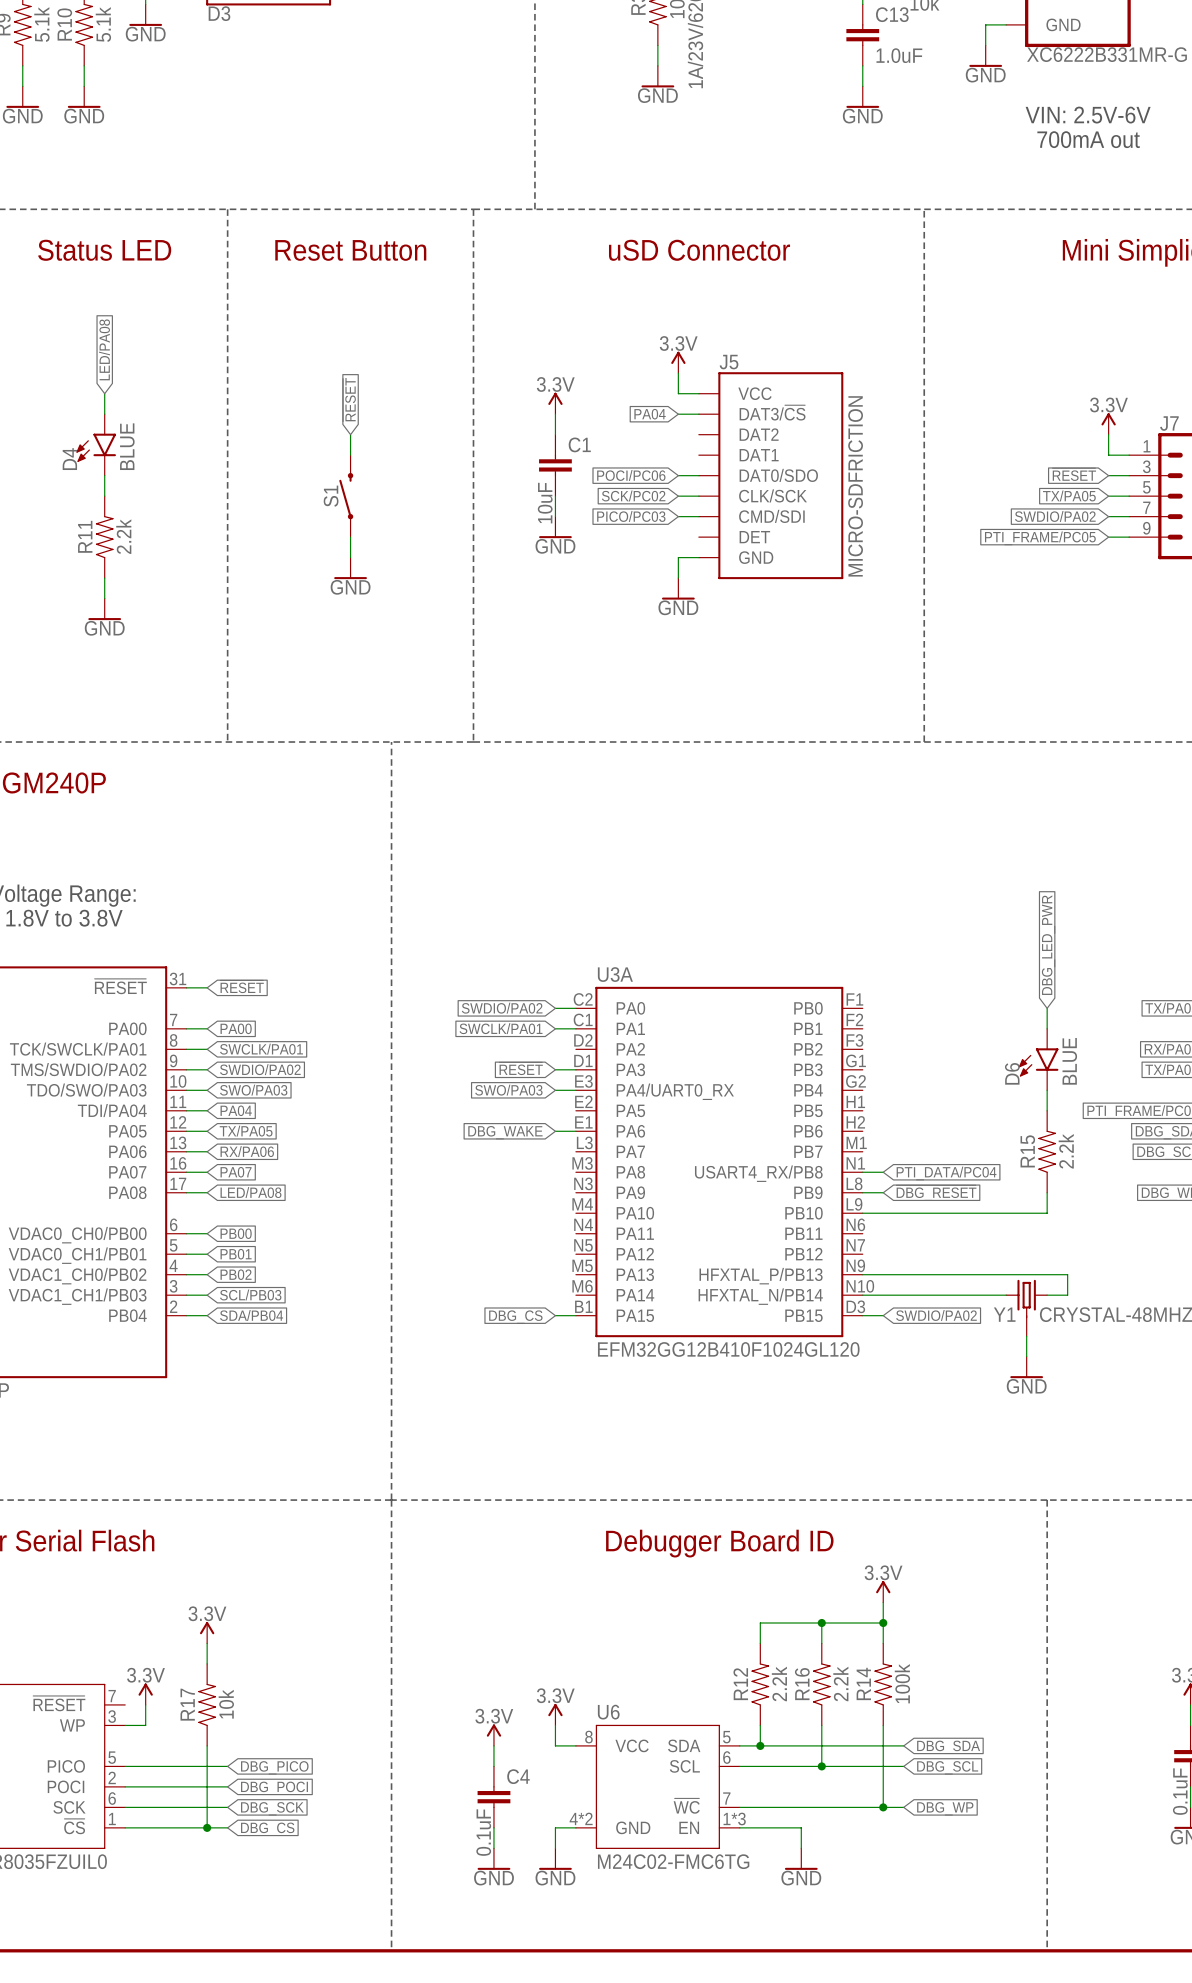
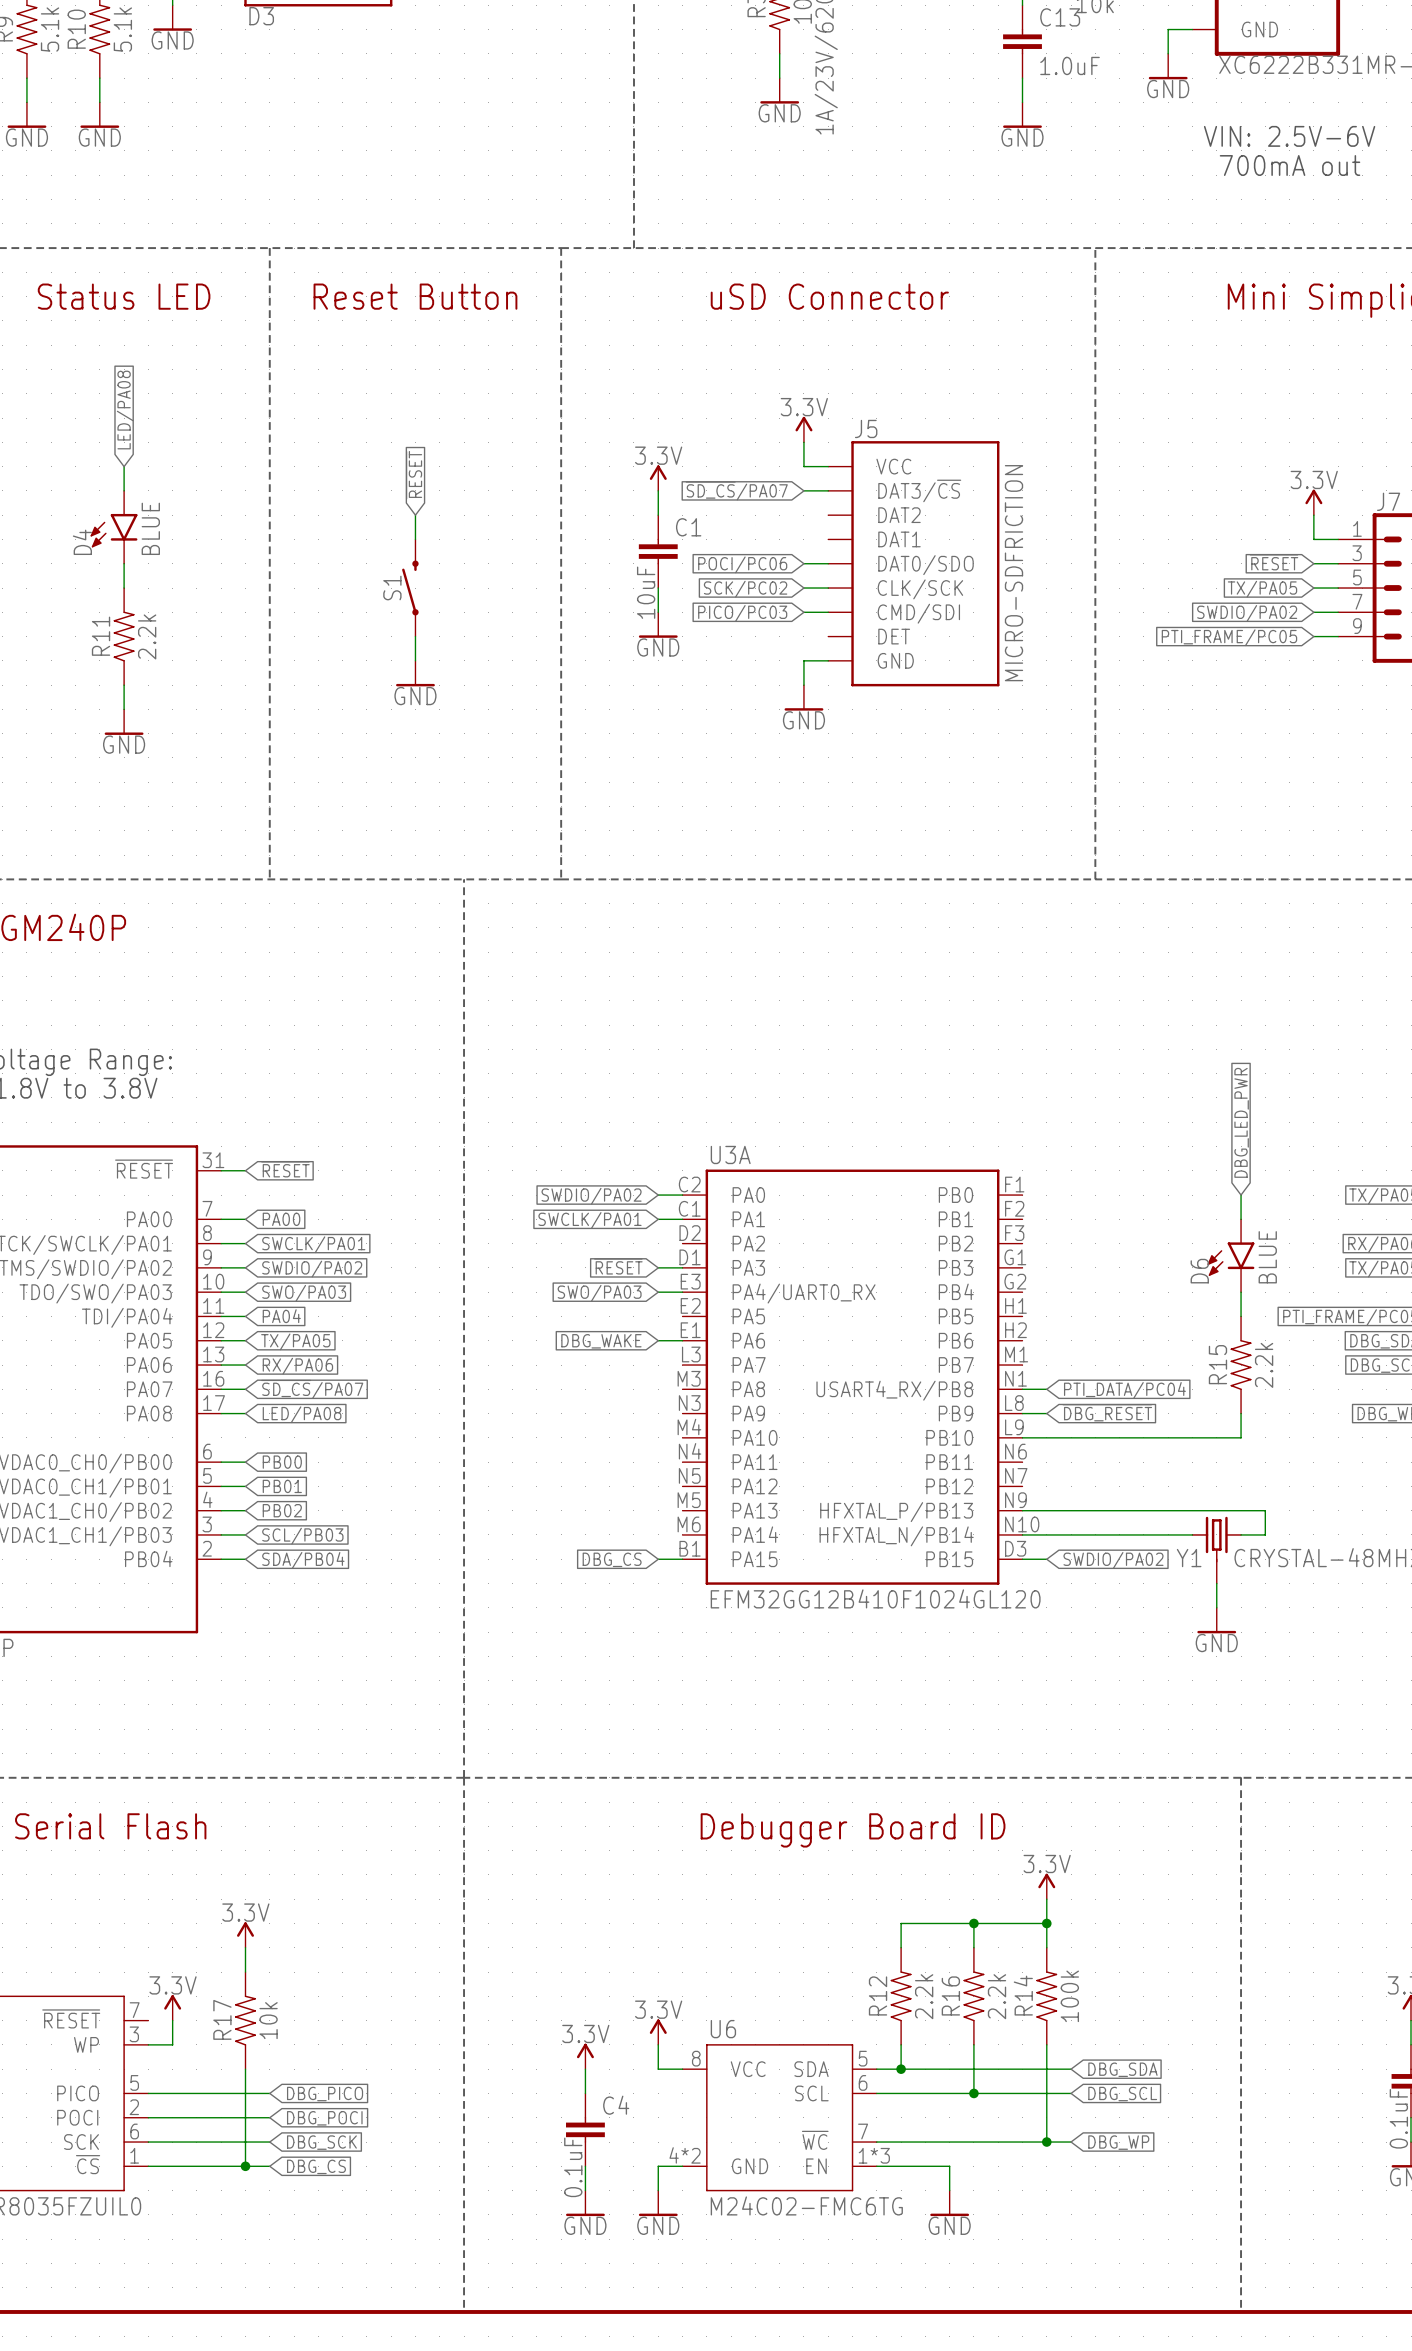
global label: PA04 (650, 414) -> ~{SD_CS}/PA07 (736, 490)
global label: PA07 (236, 1172) -> ~{SD_CS}/PA07 (312, 1389)

